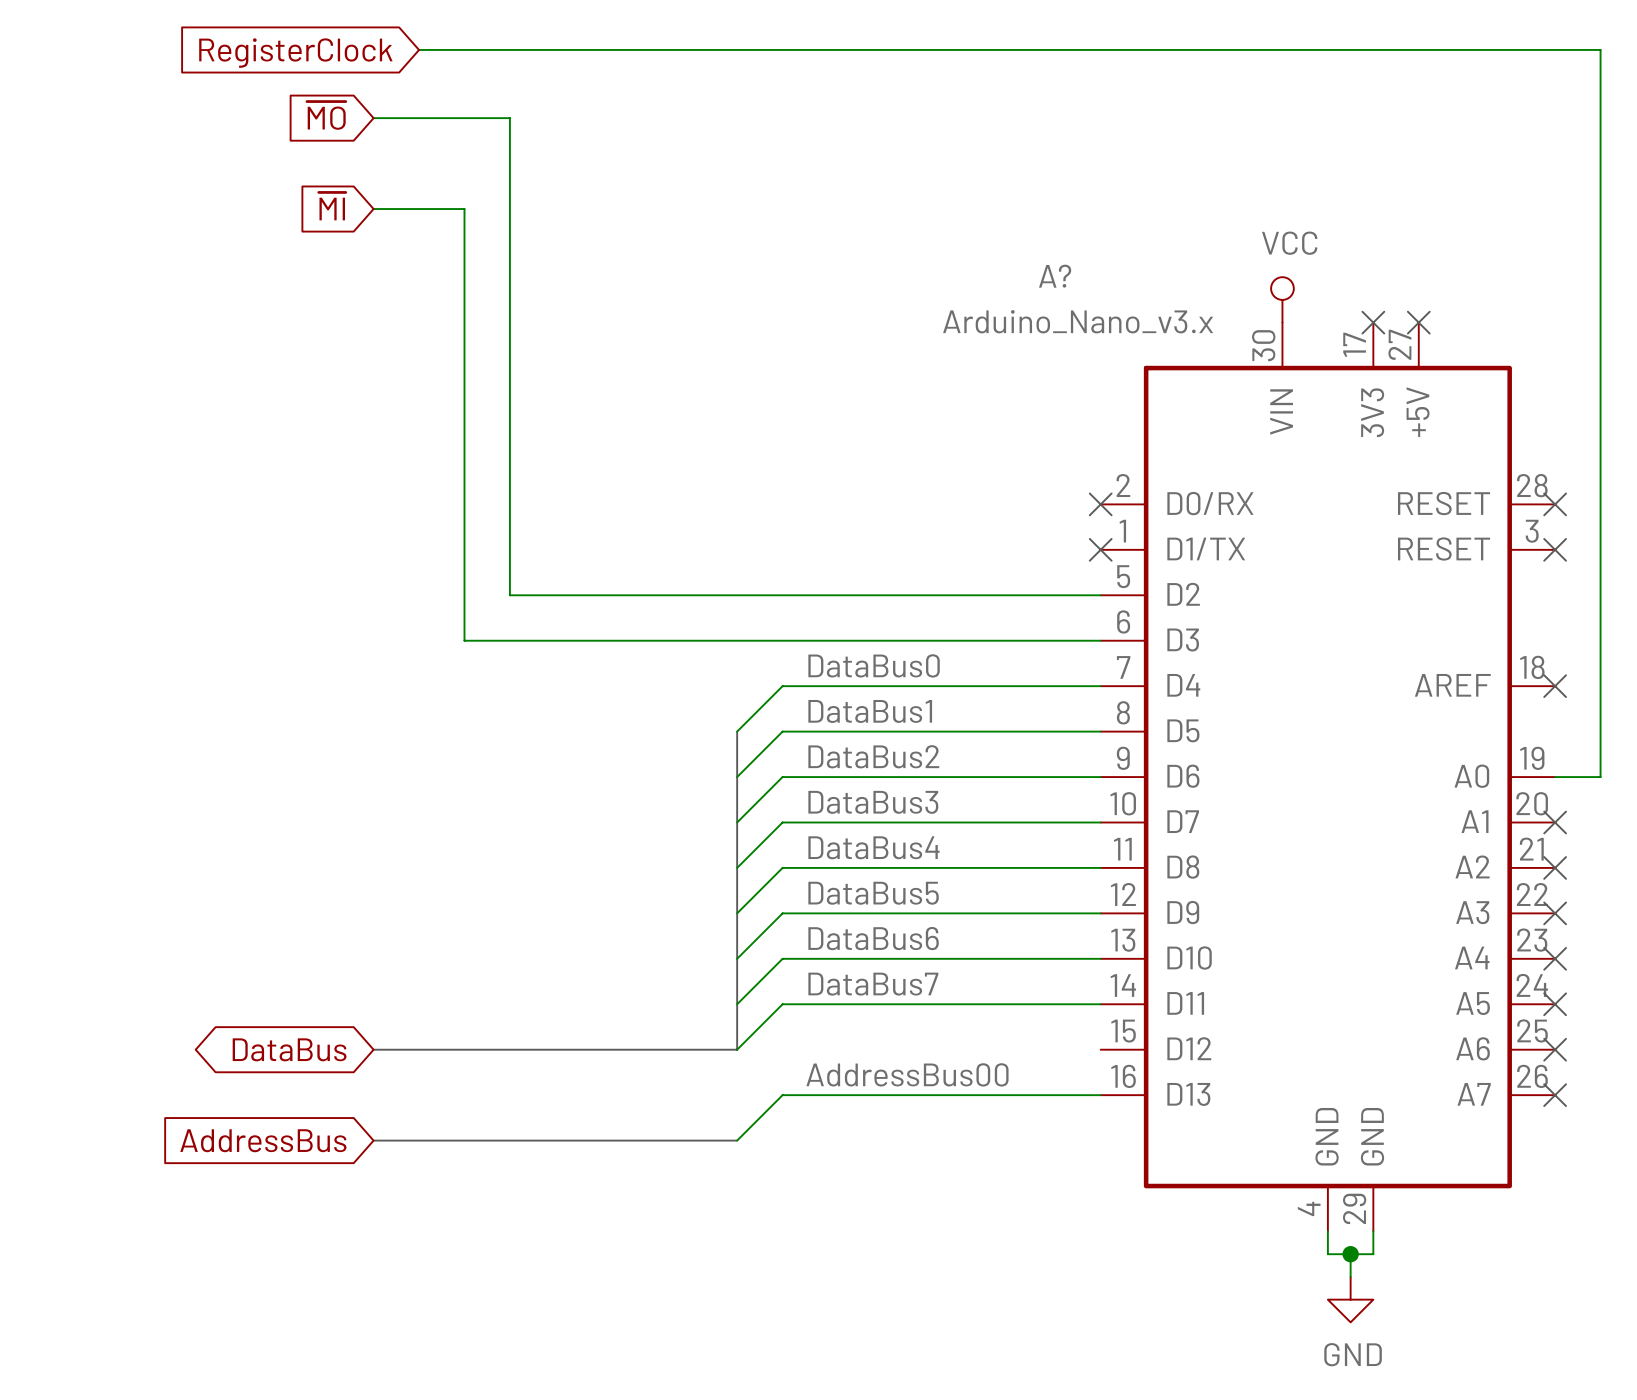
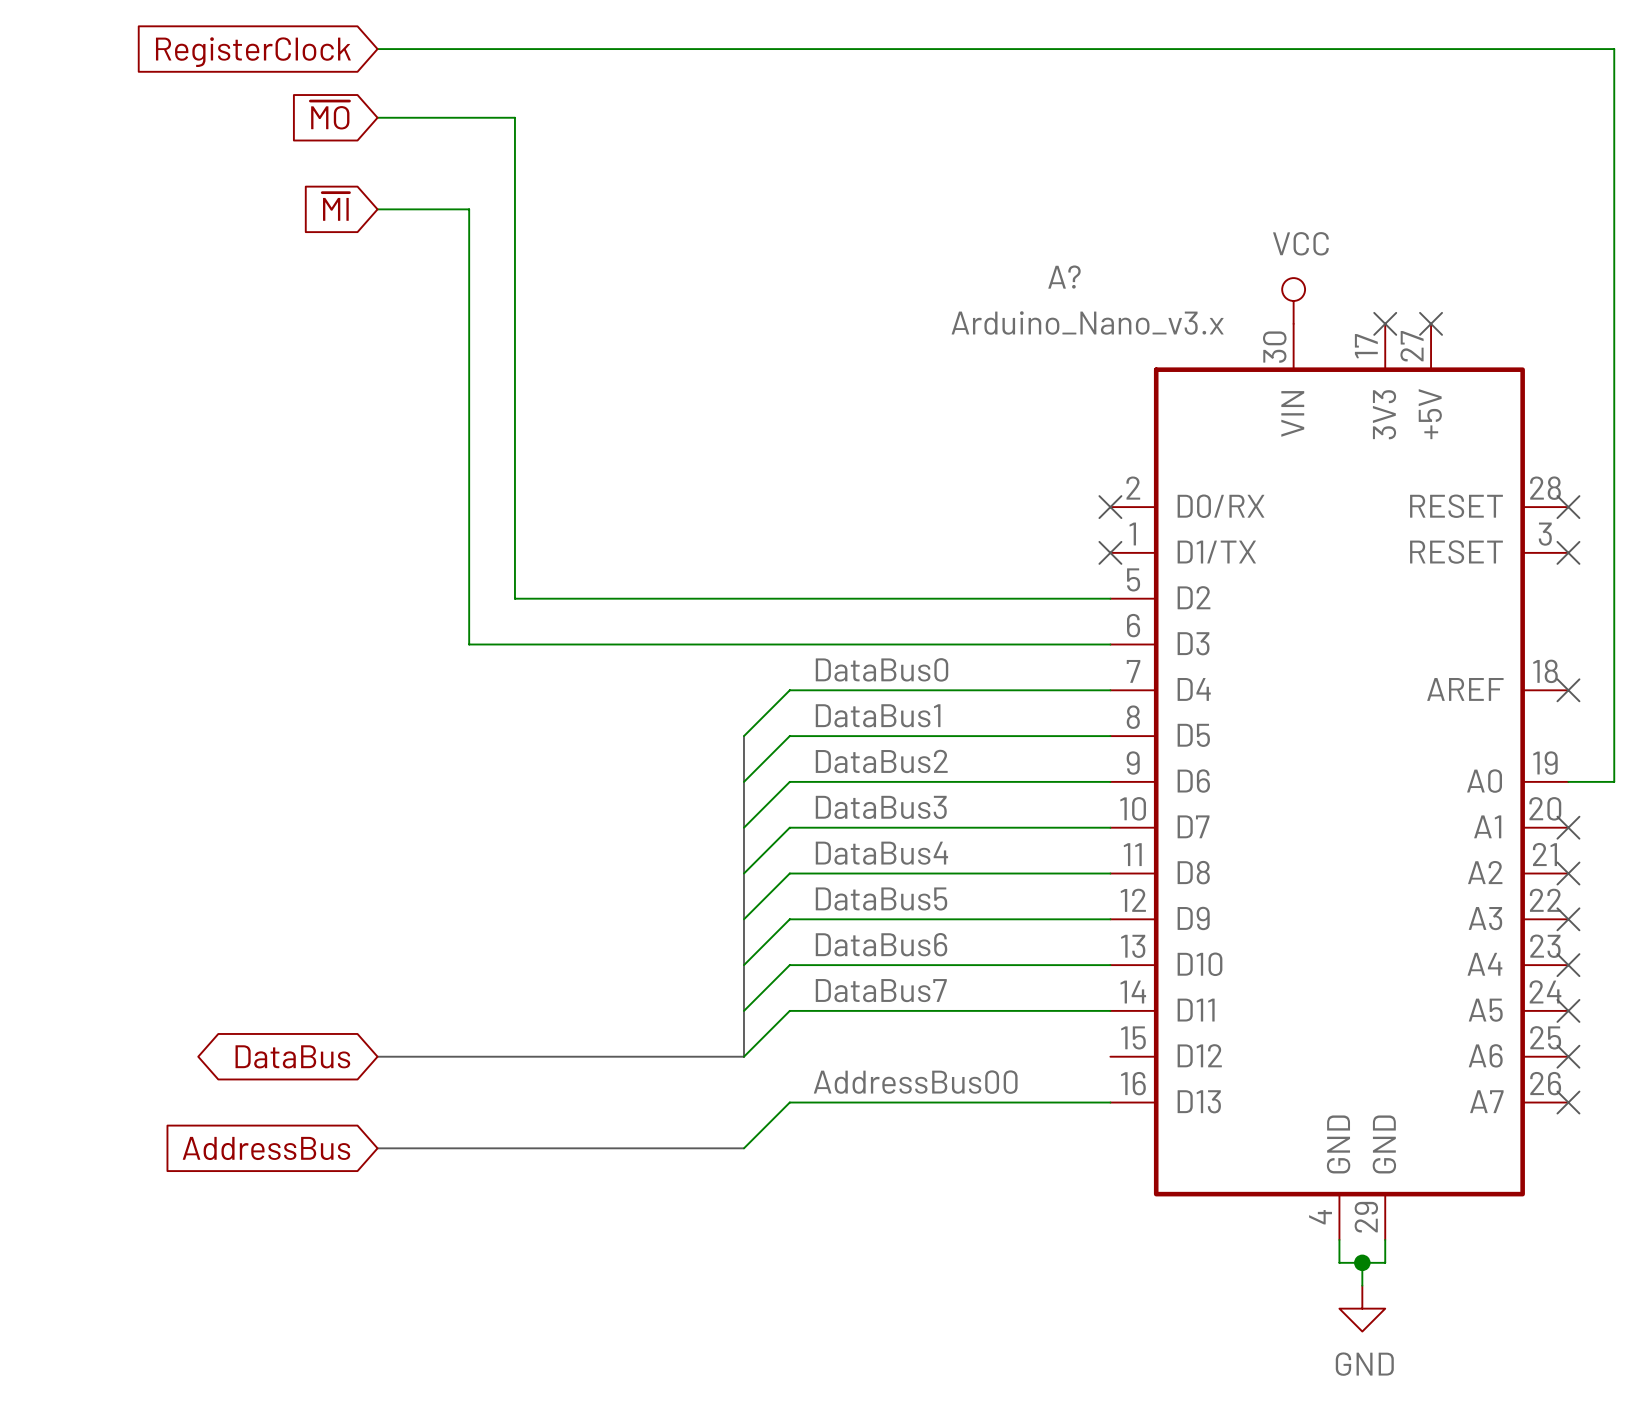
wire: none -> (377, 49) (423, 49)
global label position: RegisterClock (295, 53) -> RegisterClock (253, 52)

